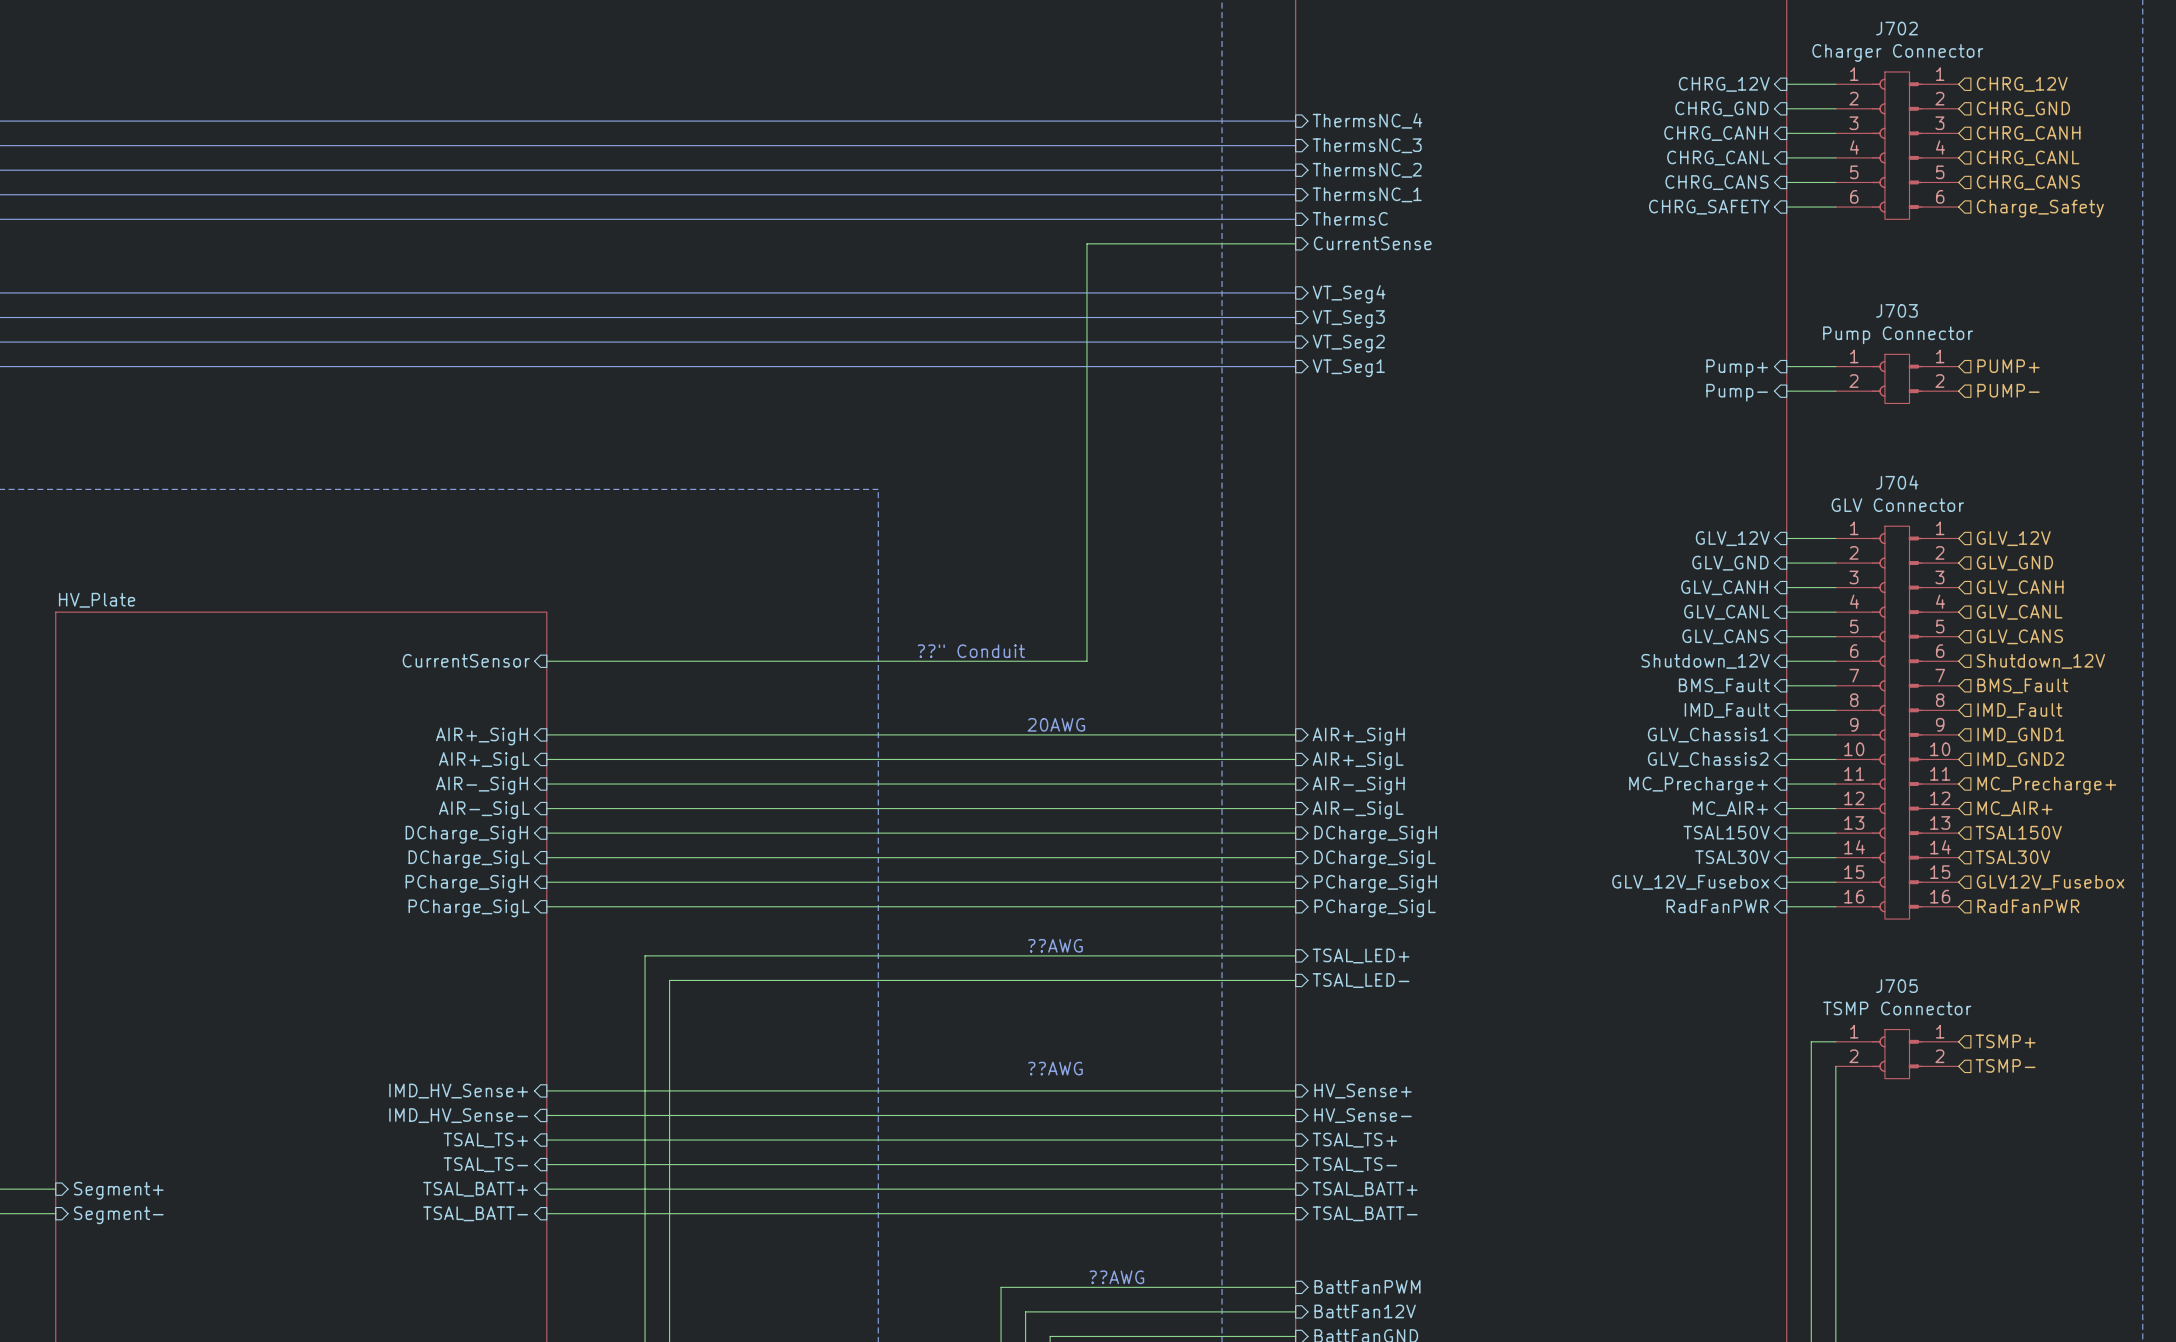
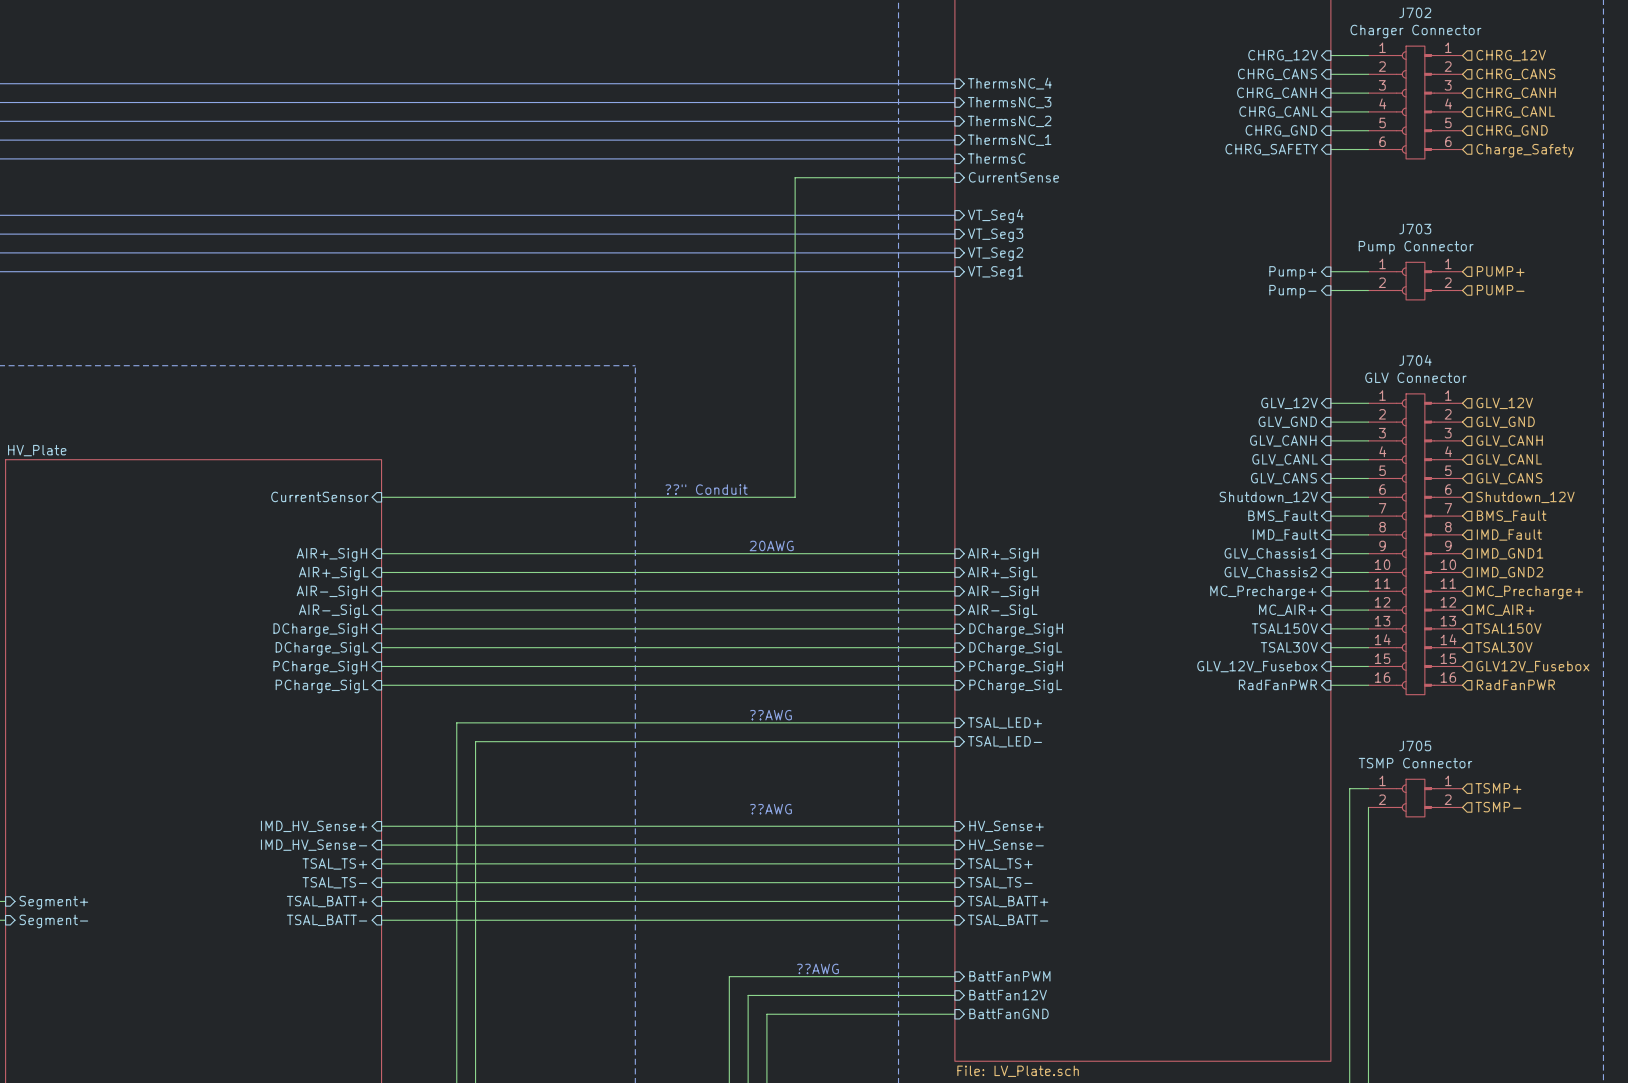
sheet pin: CHRG_GND (1721, 108) -> CHRG_CANS (1277, 74)
hierarchical label: CHRG_GND (2023, 108) -> CHRG_CANS (1515, 74)
sheet pin: CHRG_CANS (1716, 182) -> CHRG_GND (1281, 130)
hierarchical label: CHRG_CANS (2028, 182) -> CHRG_GND (1512, 130)

